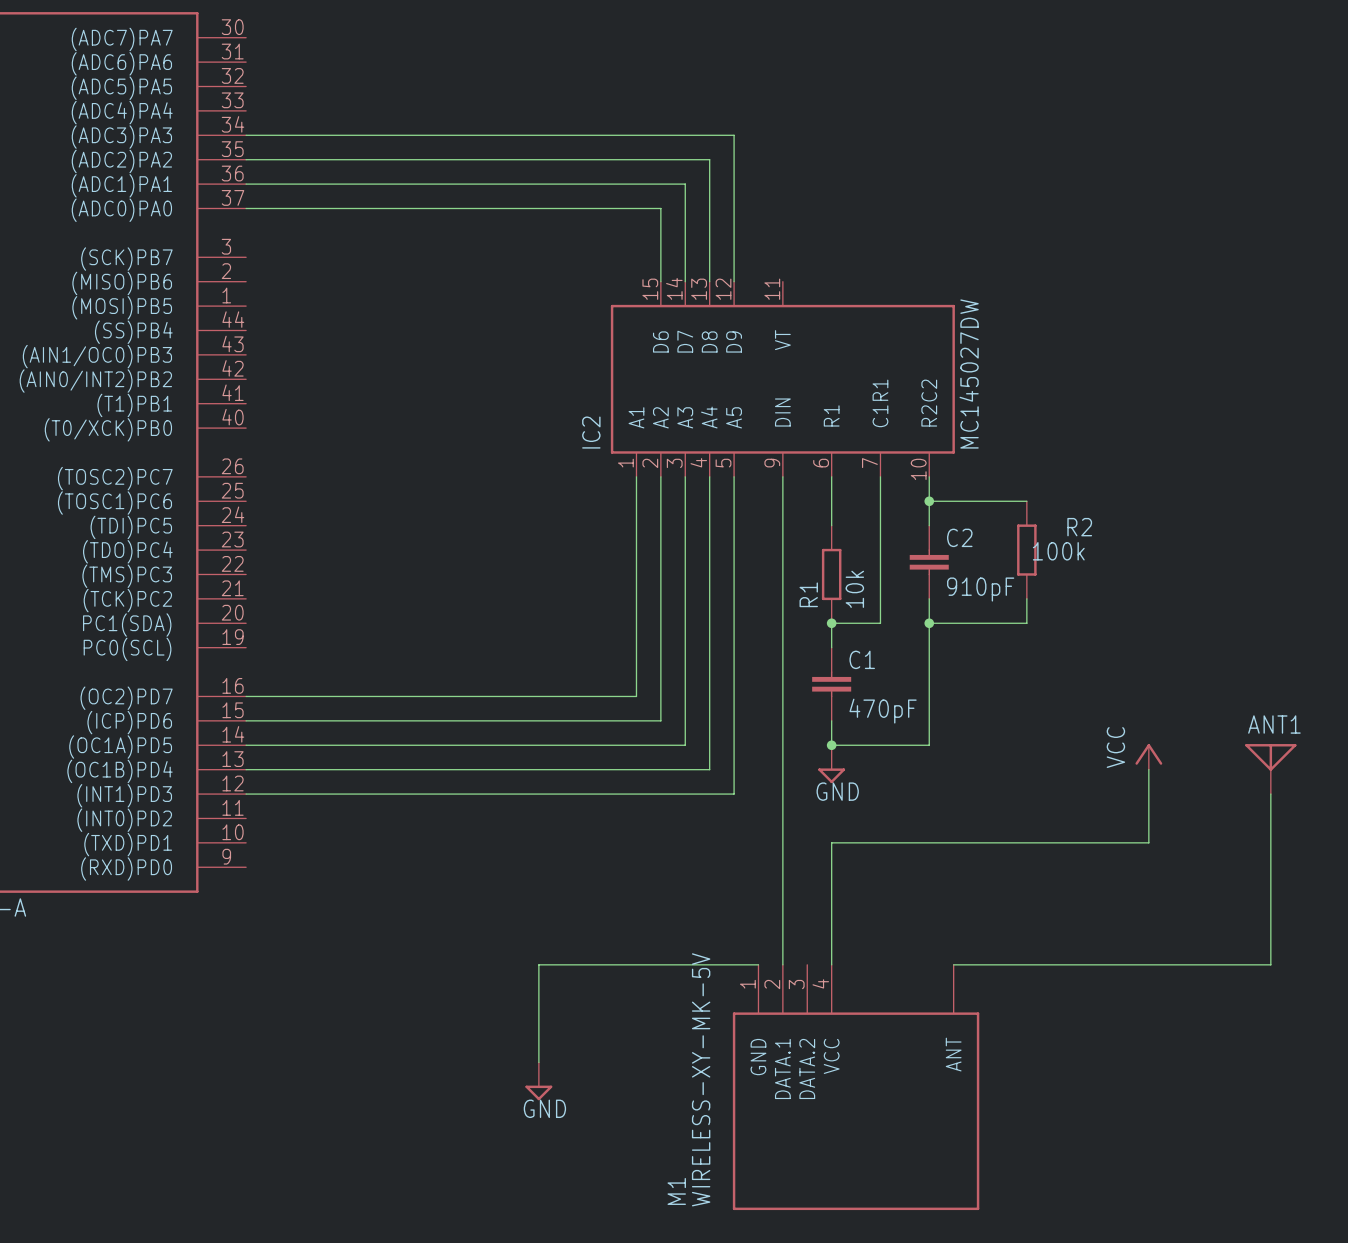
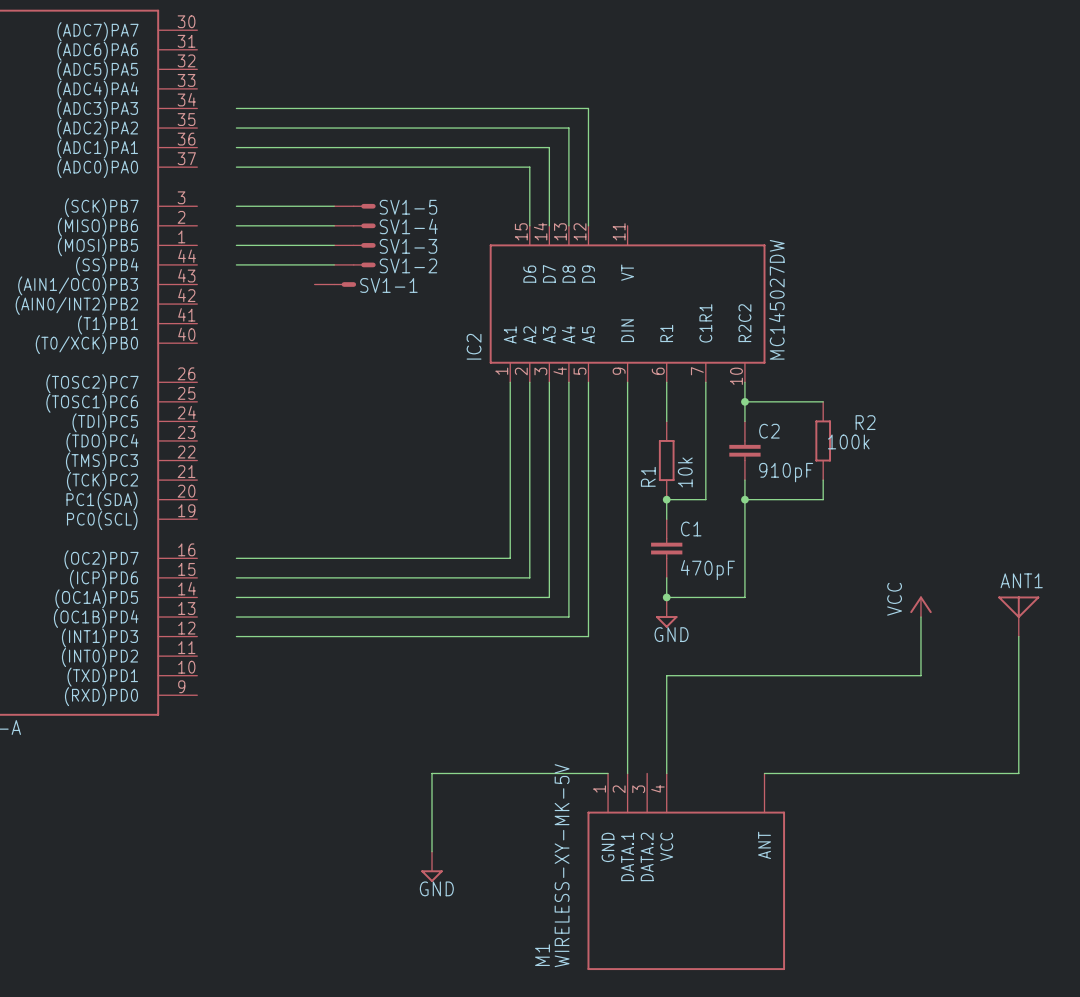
wire: (246, 135) (294, 135) -> none
wire: (246, 159) (294, 159) -> none
wire: (246, 184) (294, 184) -> none
wire: (246, 208) (294, 208) -> none
wire: none -> (236, 206) (334, 206)
SV1-5: none -> (354, 206)
wire: none -> (236, 225) (334, 225)
SV1-4: none -> (354, 225)
wire: none -> (236, 245) (334, 245)
SV1-3: none -> (354, 245)
wire: none -> (236, 264) (334, 264)
SV1-2: none -> (354, 264)
SV1-1: none -> (335, 284)
wire: (246, 696) (294, 696) -> none
wire: (246, 720) (294, 720) -> none
wire: (246, 745) (294, 745) -> none
wire: (246, 769) (294, 769) -> none
wire: (246, 794) (294, 794) -> none

